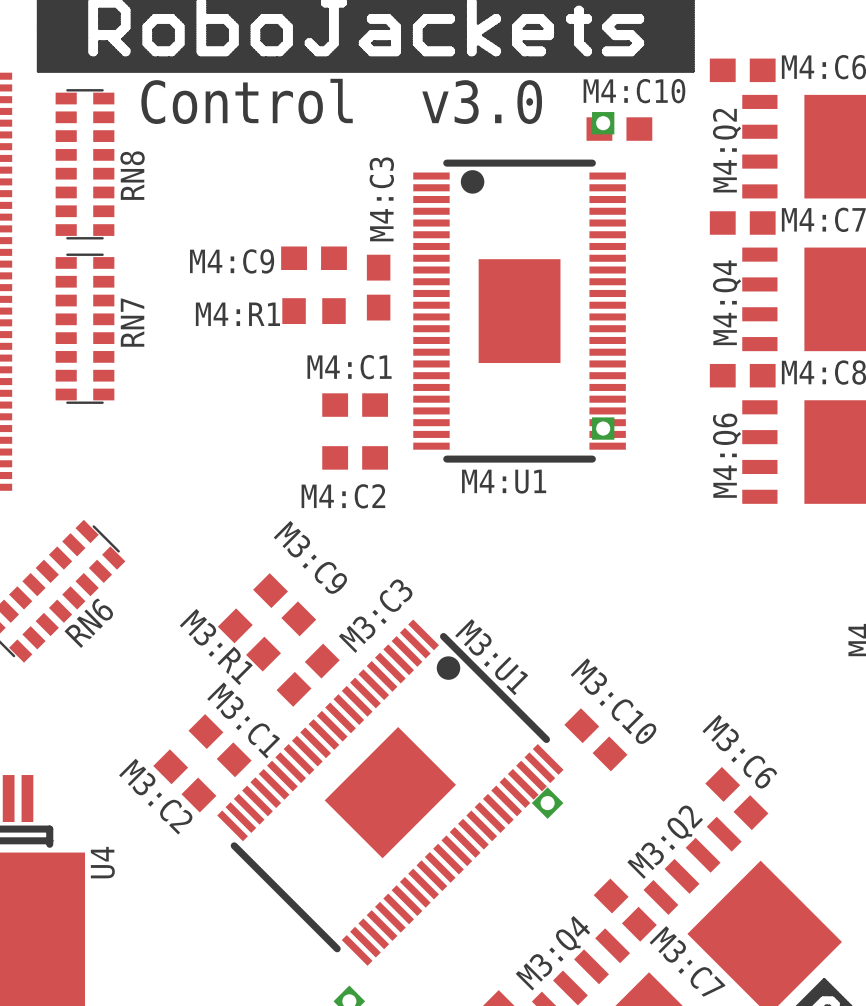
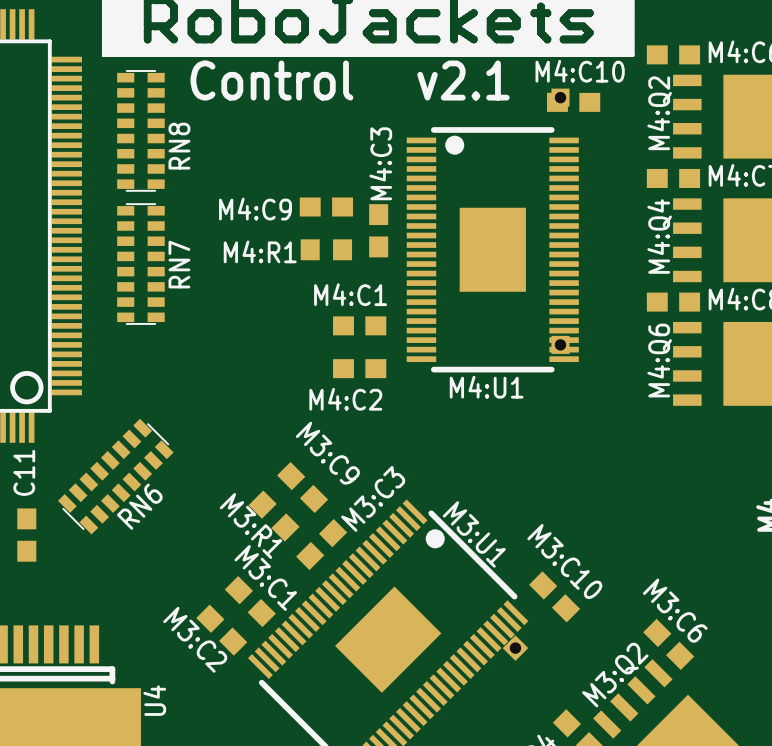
text: v3.0 (482, 102) -> v2.1 (463, 80)

